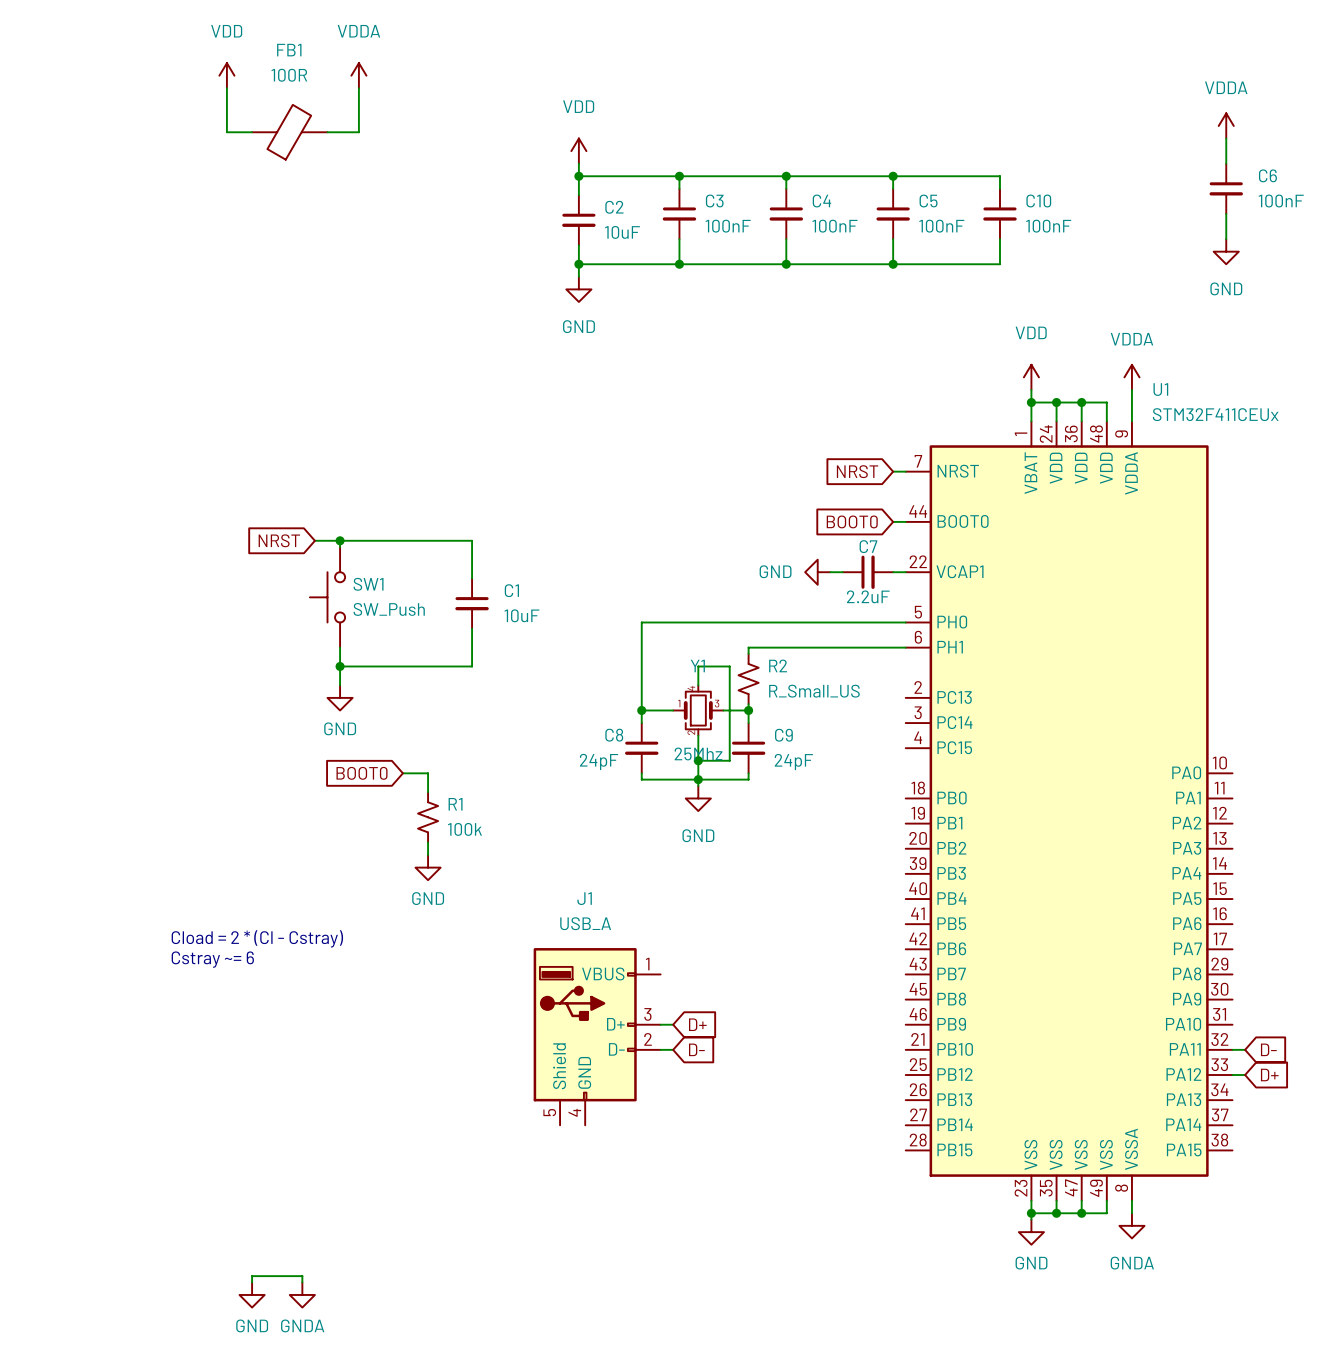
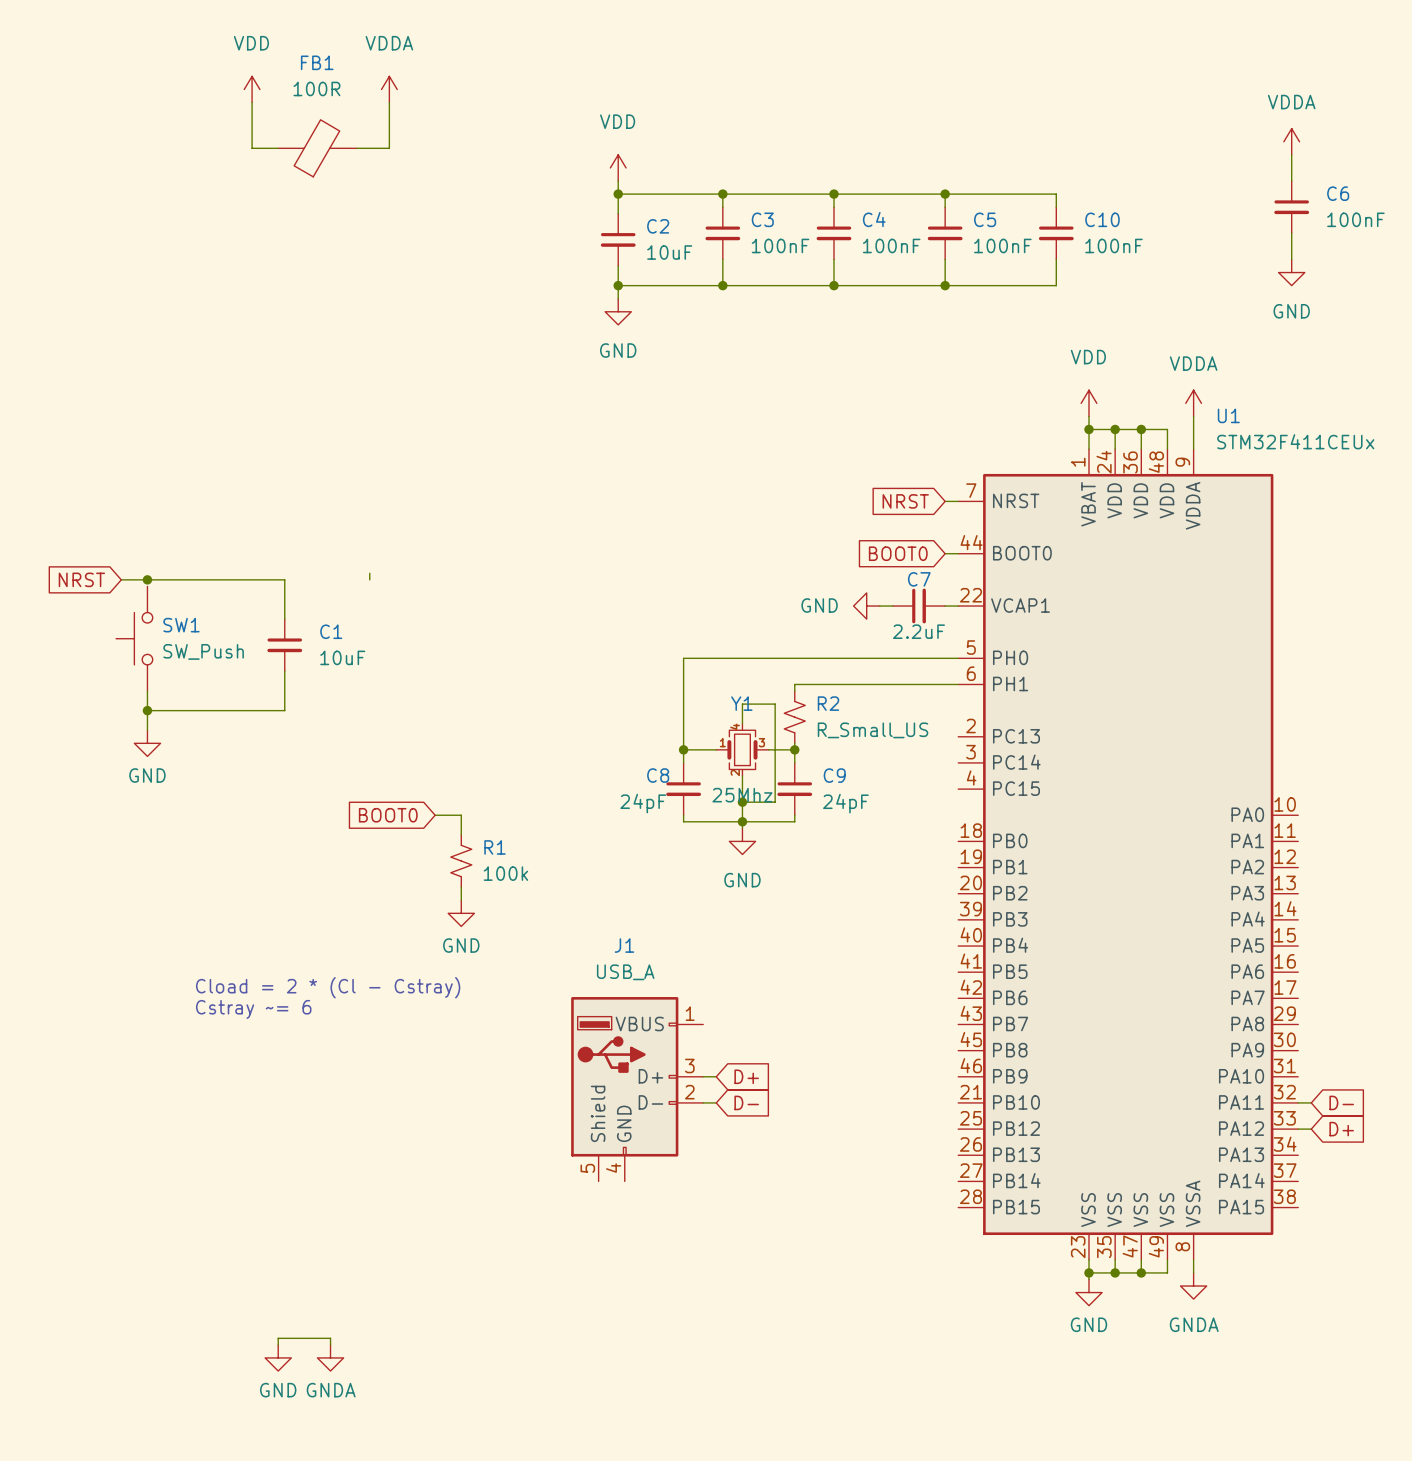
global label position: NRST (279, 540) -> NRST (81, 579)
wire: (314, 540) (472, 540) (472, 578) -> (121, 579) (284, 579) (284, 619)
junction: (340, 540) -> none
junction: none -> (147, 579)
SW1 position: (327, 597) -> (134, 638)
C1 position: (472, 603) -> (284, 645)
wire: (472, 628) (472, 666) (340, 666) -> (284, 671) (284, 710) (147, 710)
wire: (340, 647) (340, 685) -> (147, 691) (147, 730)
junction: (340, 666) -> none
junction: none -> (147, 710)
power symbol position: GND (340, 697) -> GND (147, 743)

